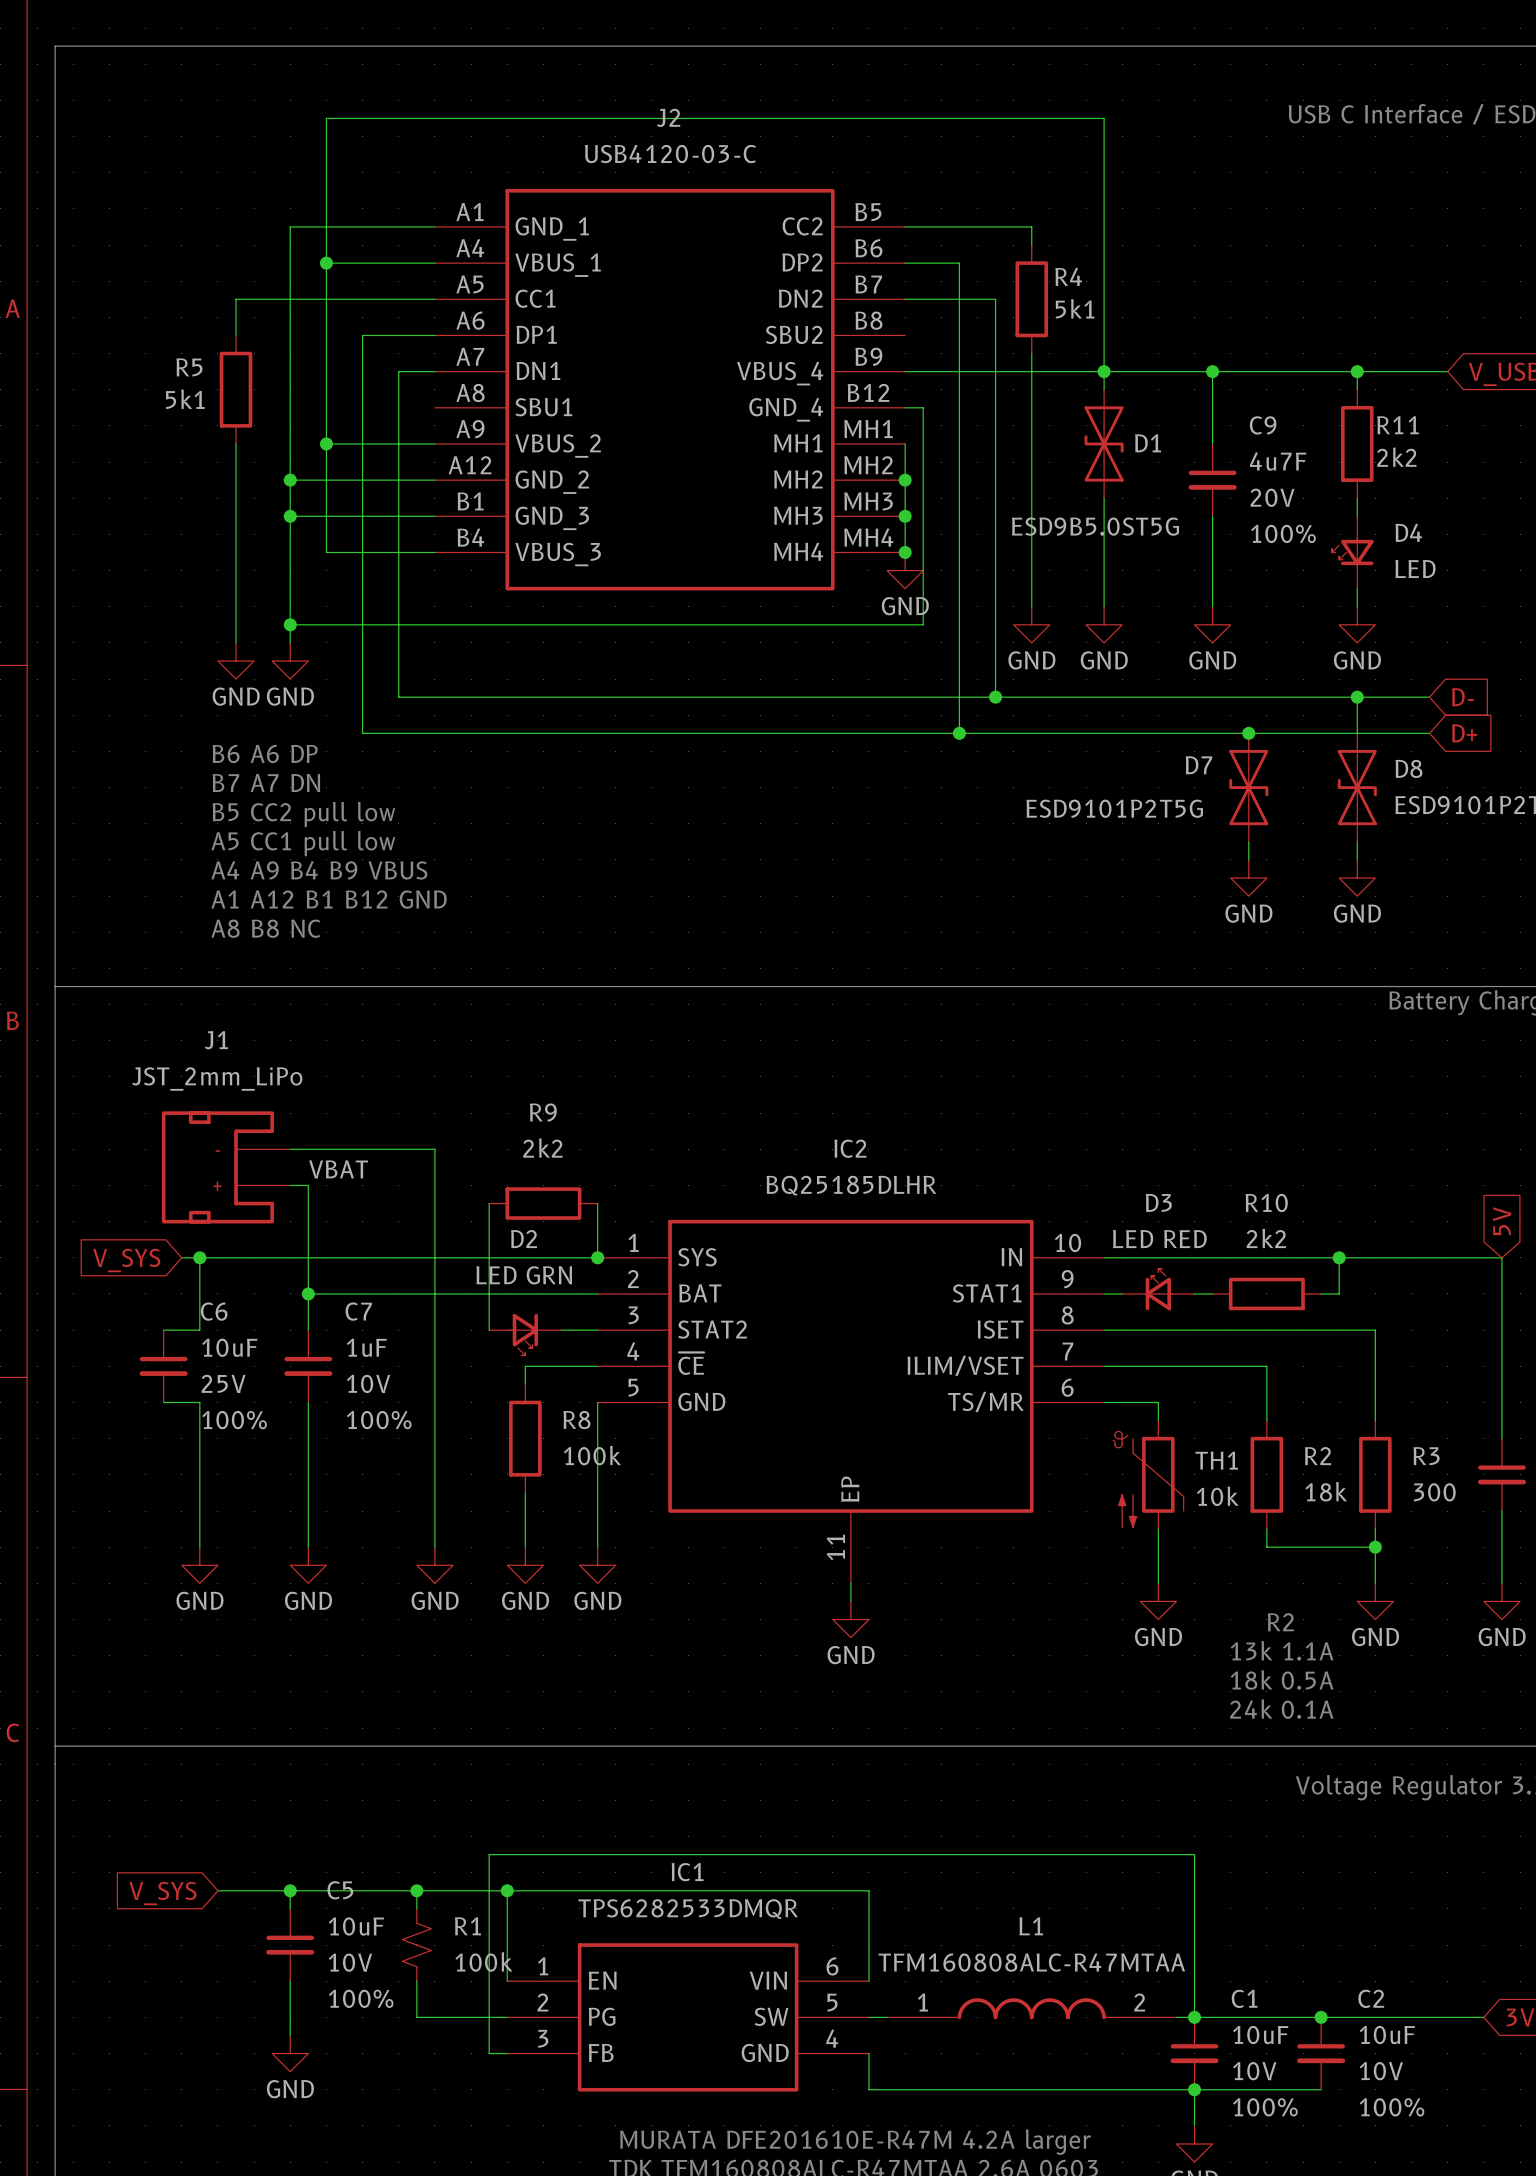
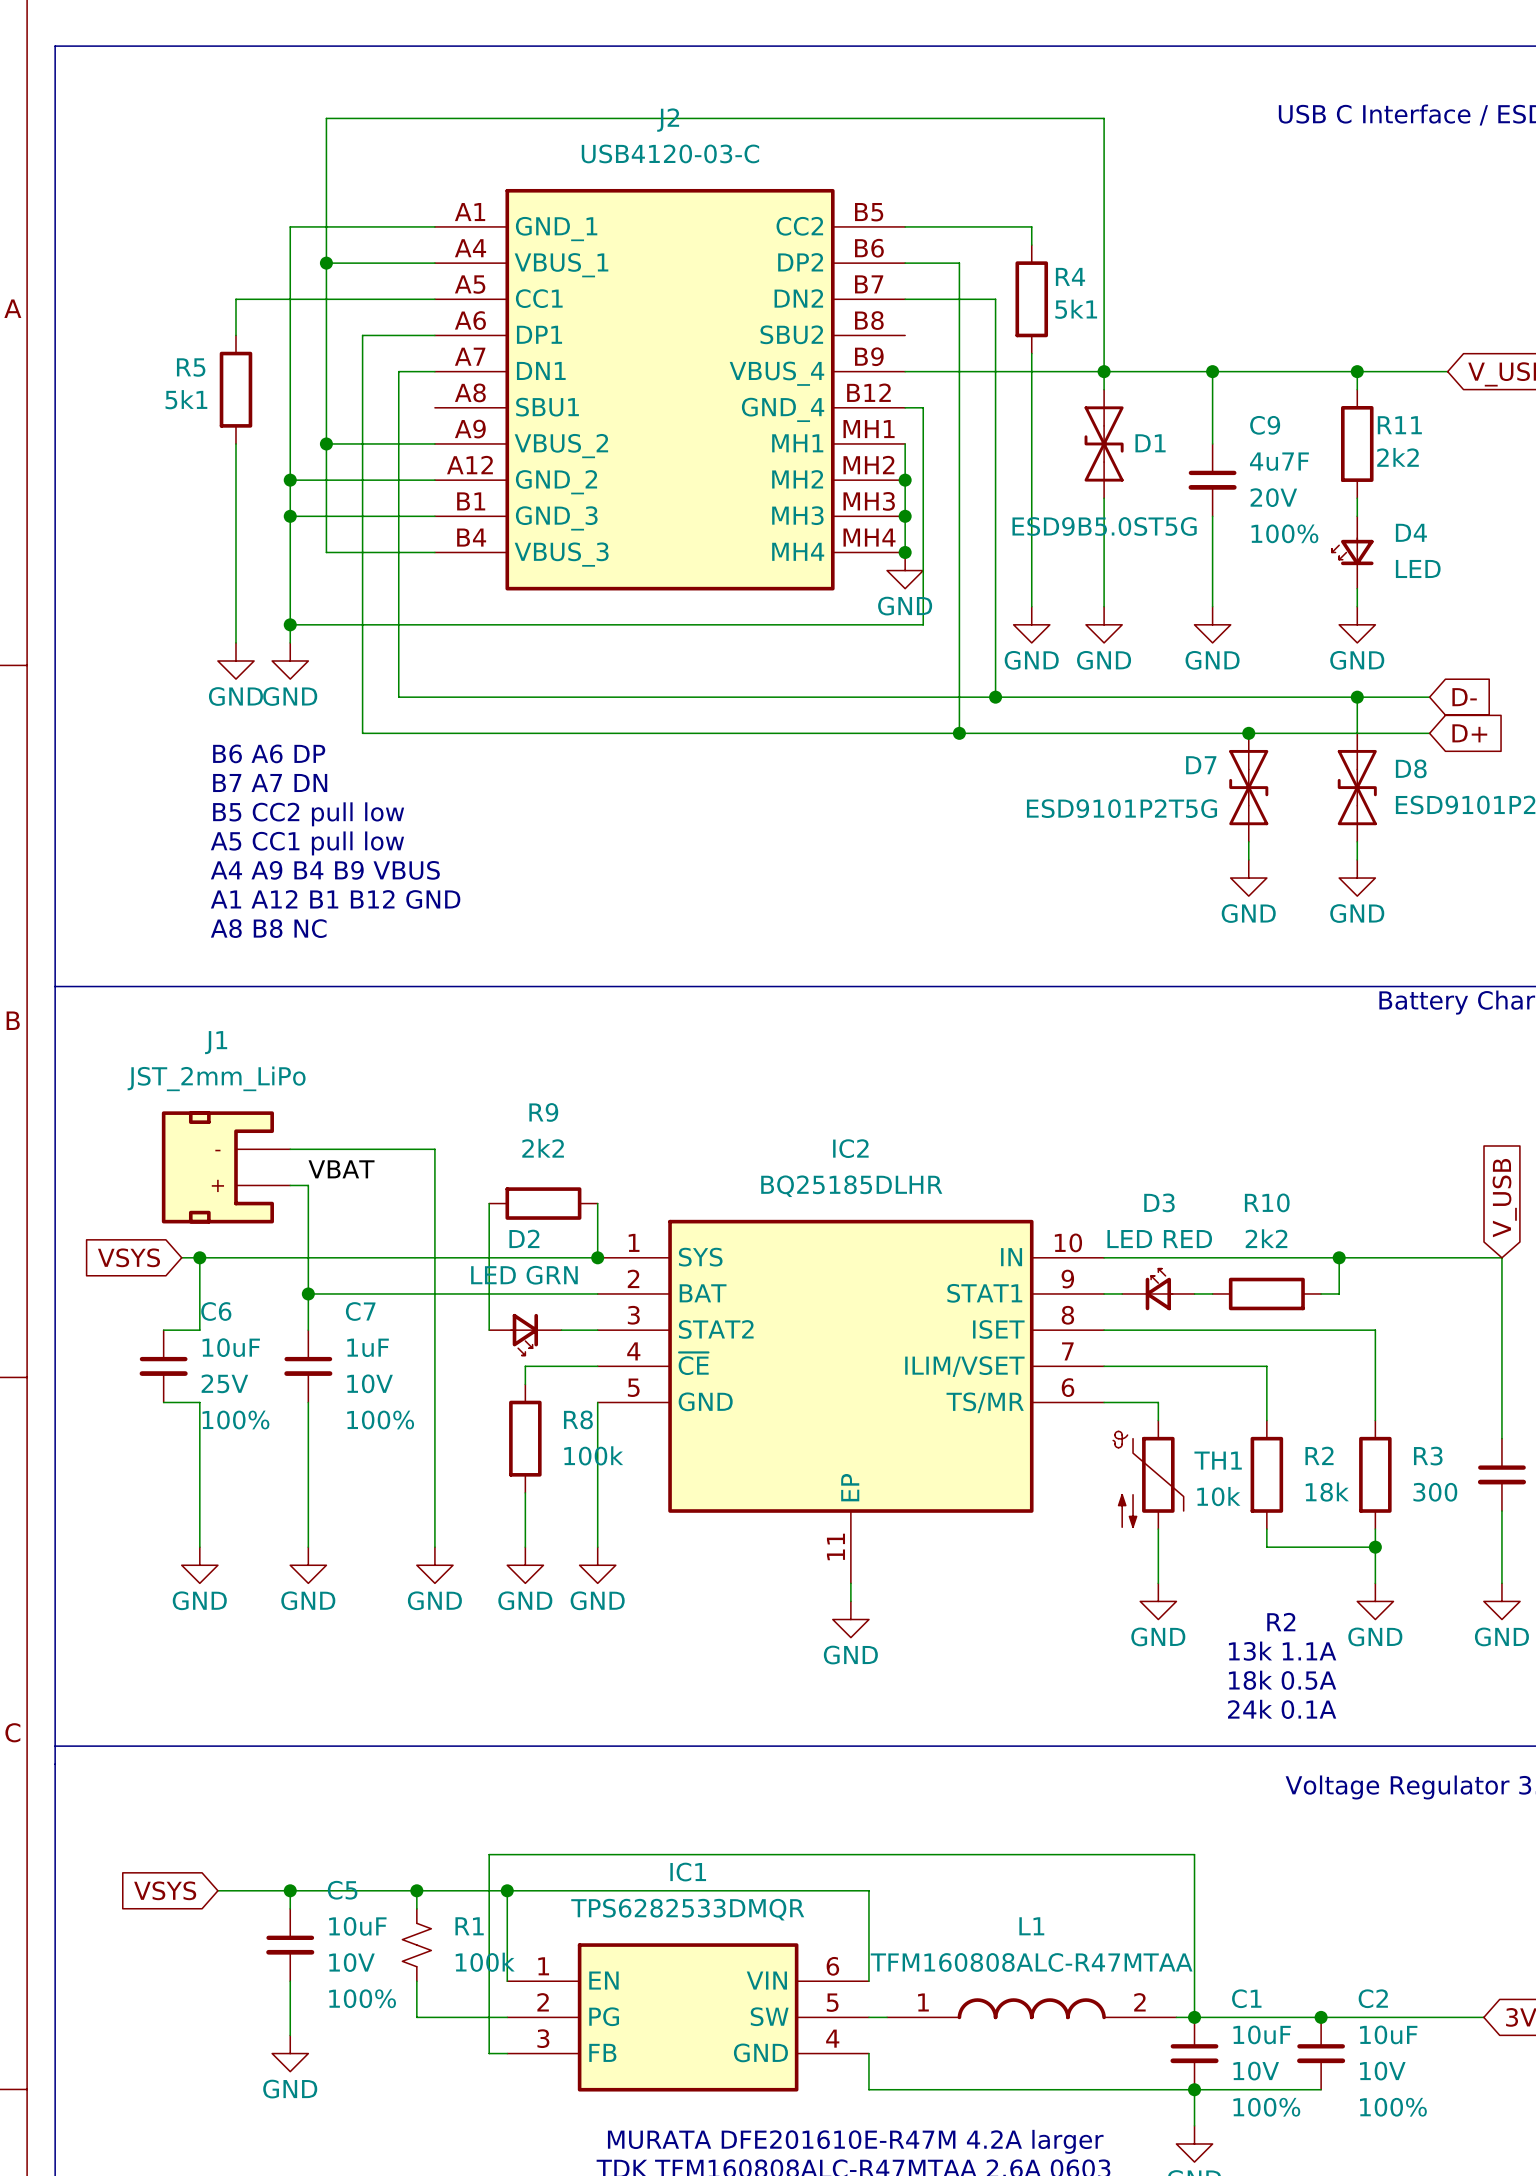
global label: 5V (1502, 1221) -> V_USB (1504, 1198)
global label: V_SYS (126, 1260) -> VSYS (128, 1257)
global label: V_SYS (162, 1893) -> VSYS (165, 1890)

